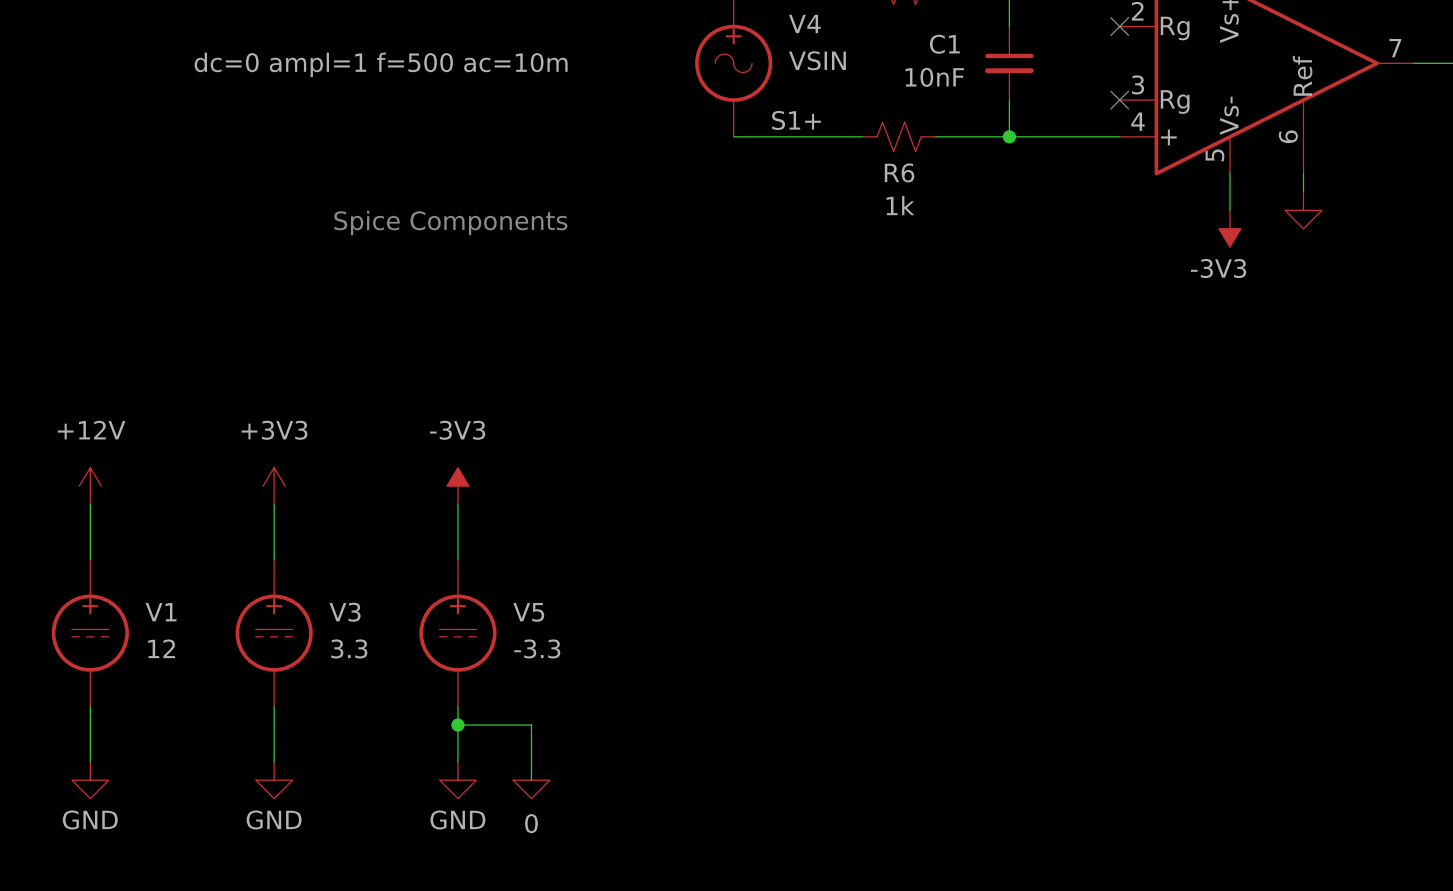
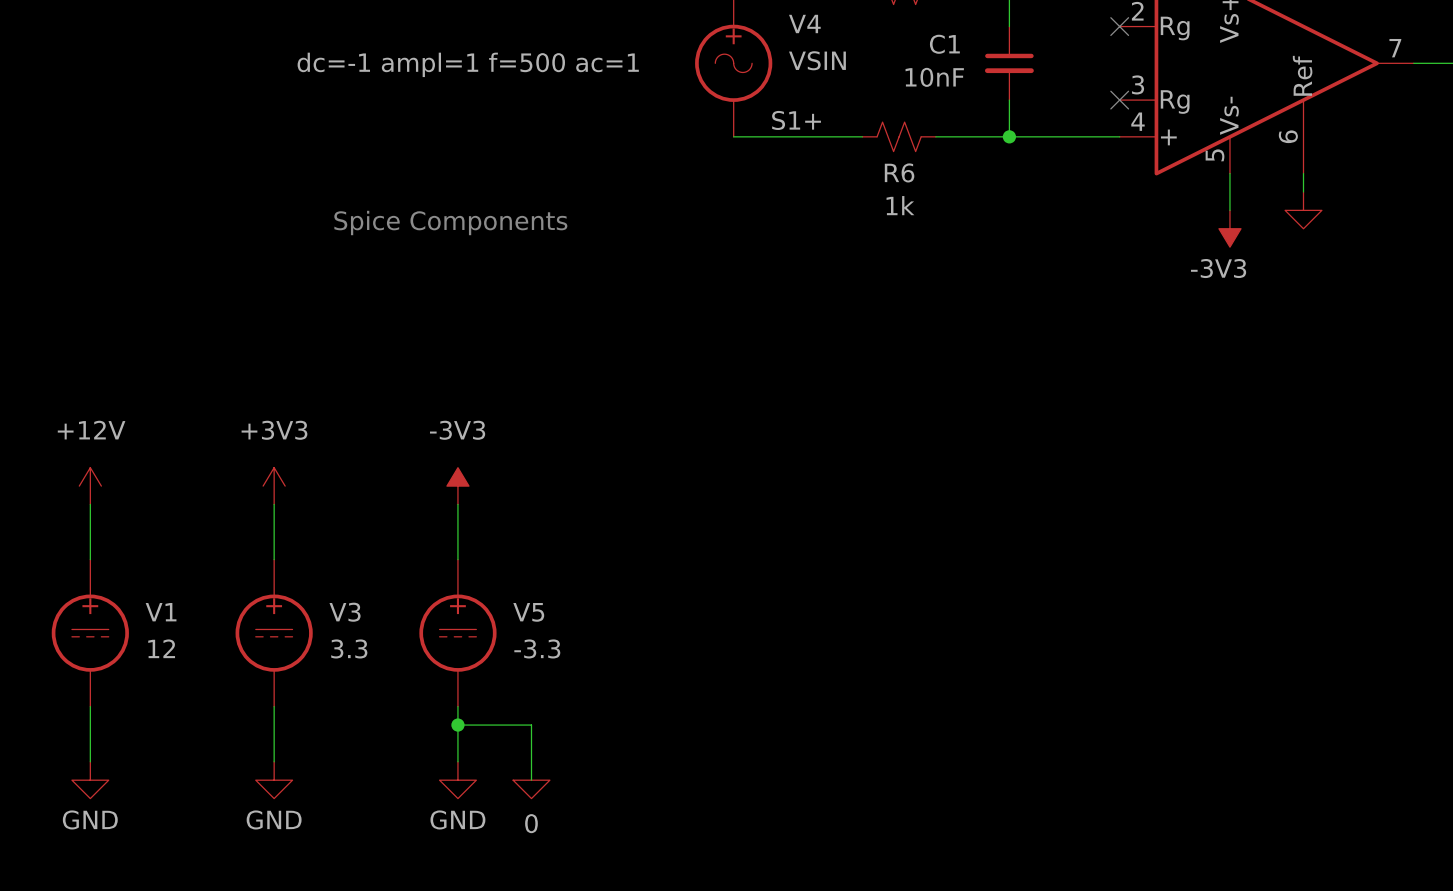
V4 text: dc=0 ampl=1 f=500 ac=10m (381, 64) -> dc=-1 ampl=1 f=500 ac=1 (468, 64)

